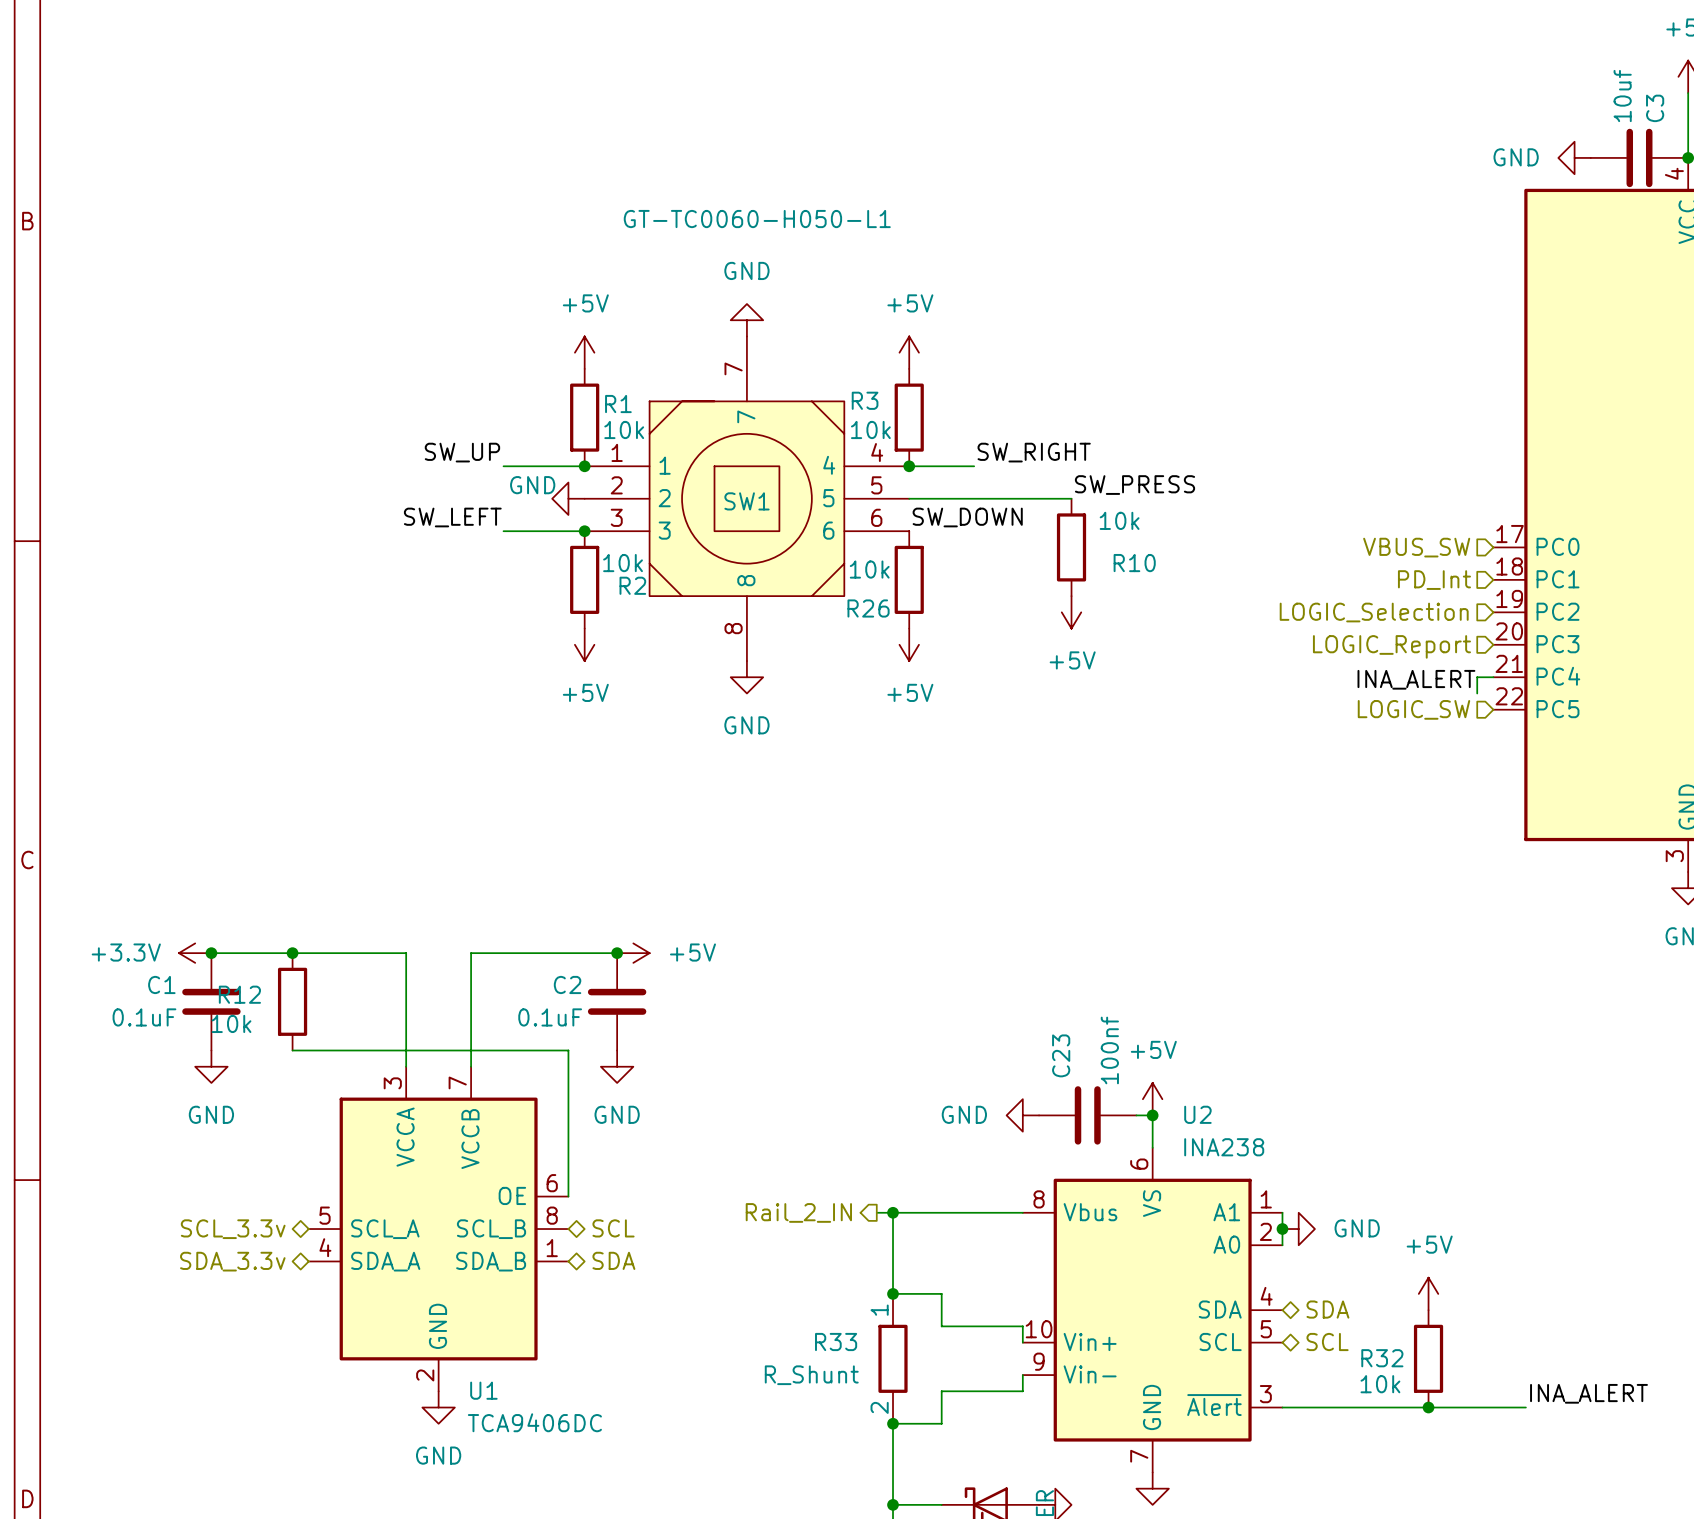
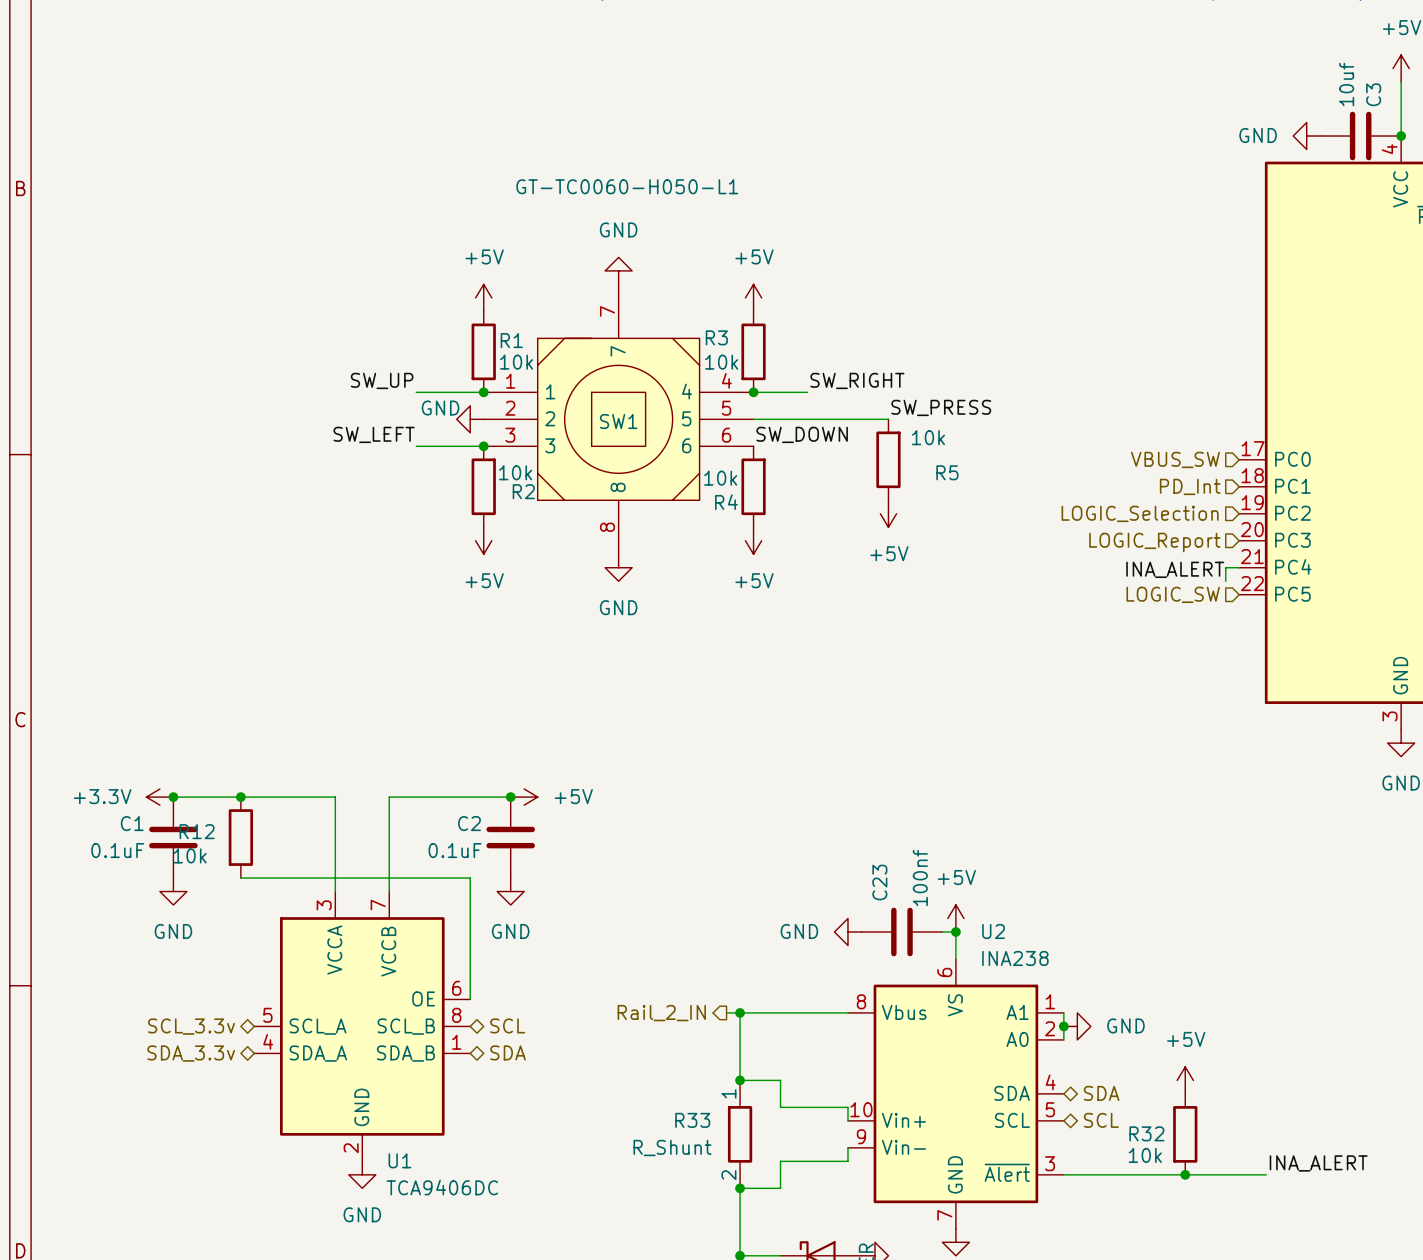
R10 name: R10 (1134, 563) -> R5 (947, 472)
R26 name: R26 (868, 608) -> R4 (726, 502)

